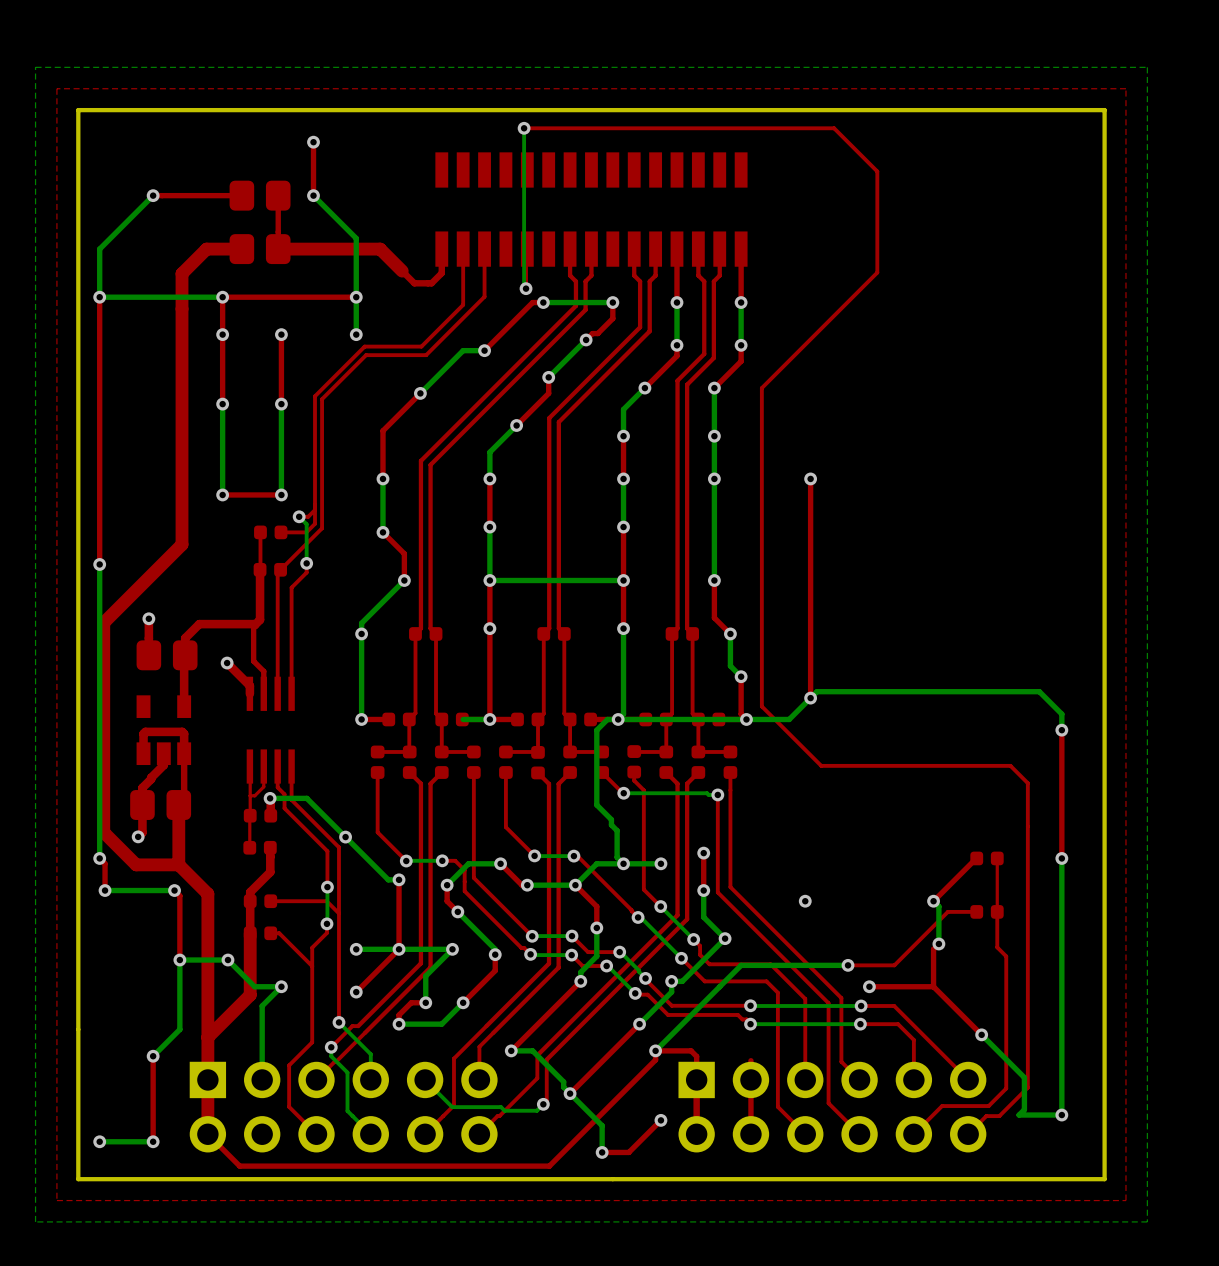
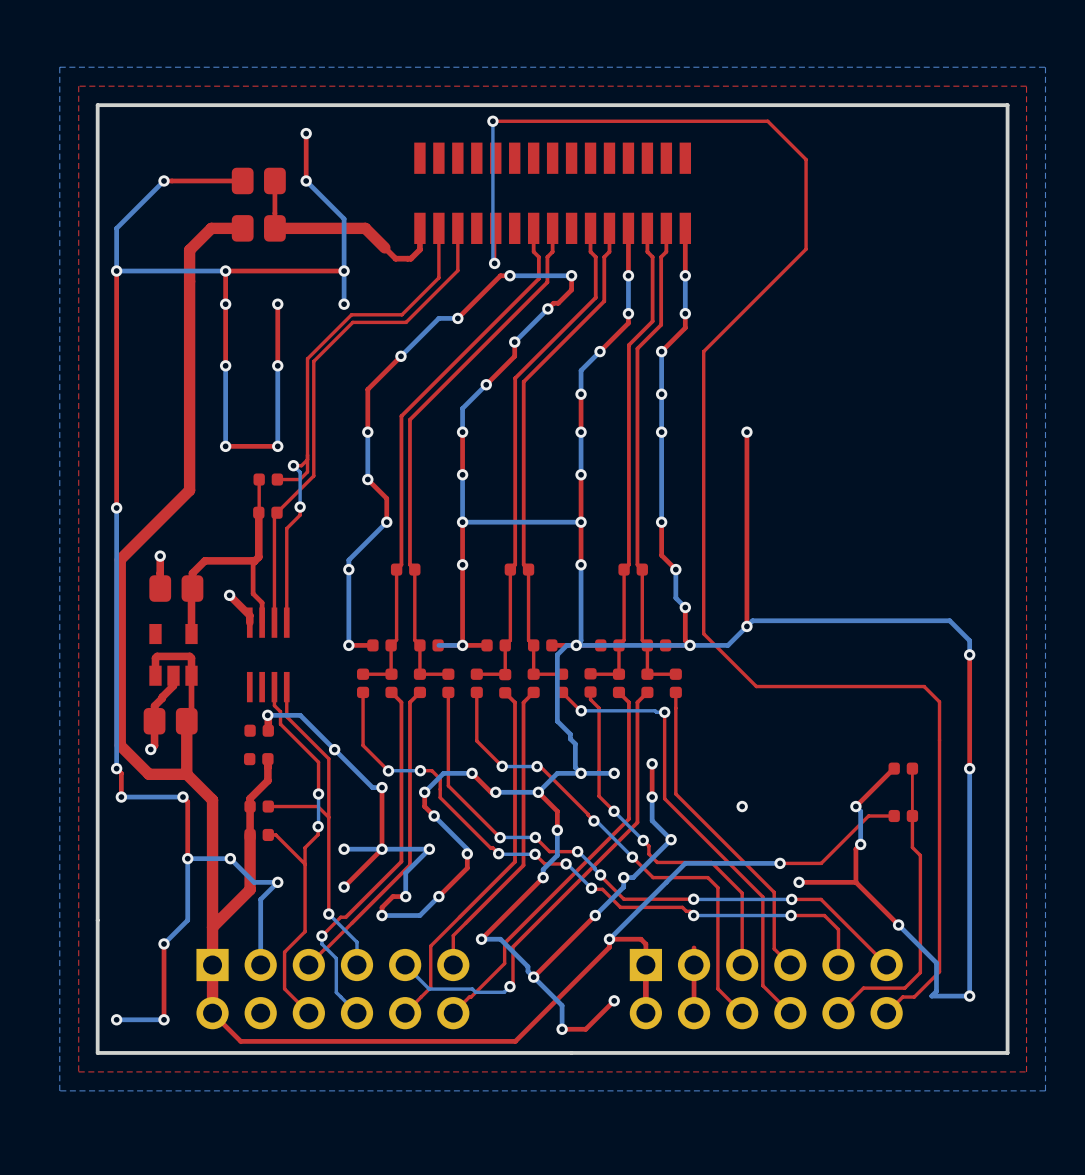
top track: (249, 766) (249, 847) -> none
top track: (263, 766) (263, 786) (254, 795) (250, 795) -> none

